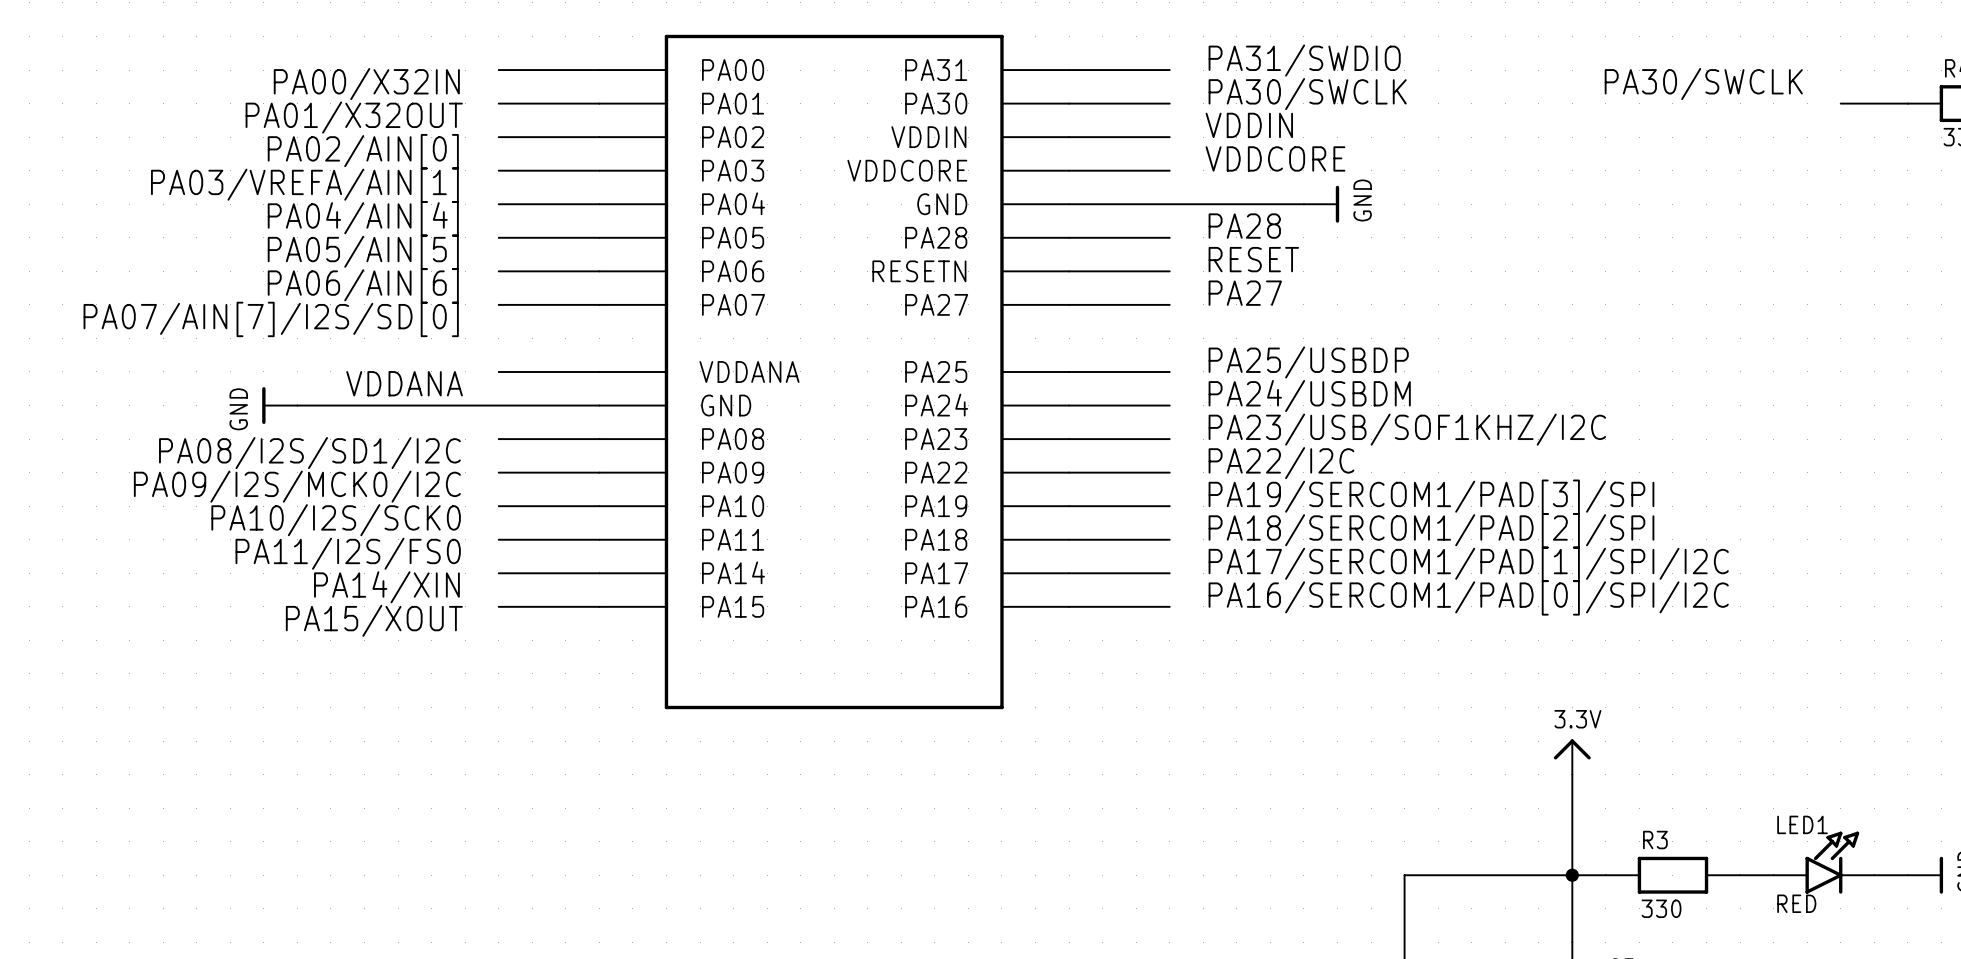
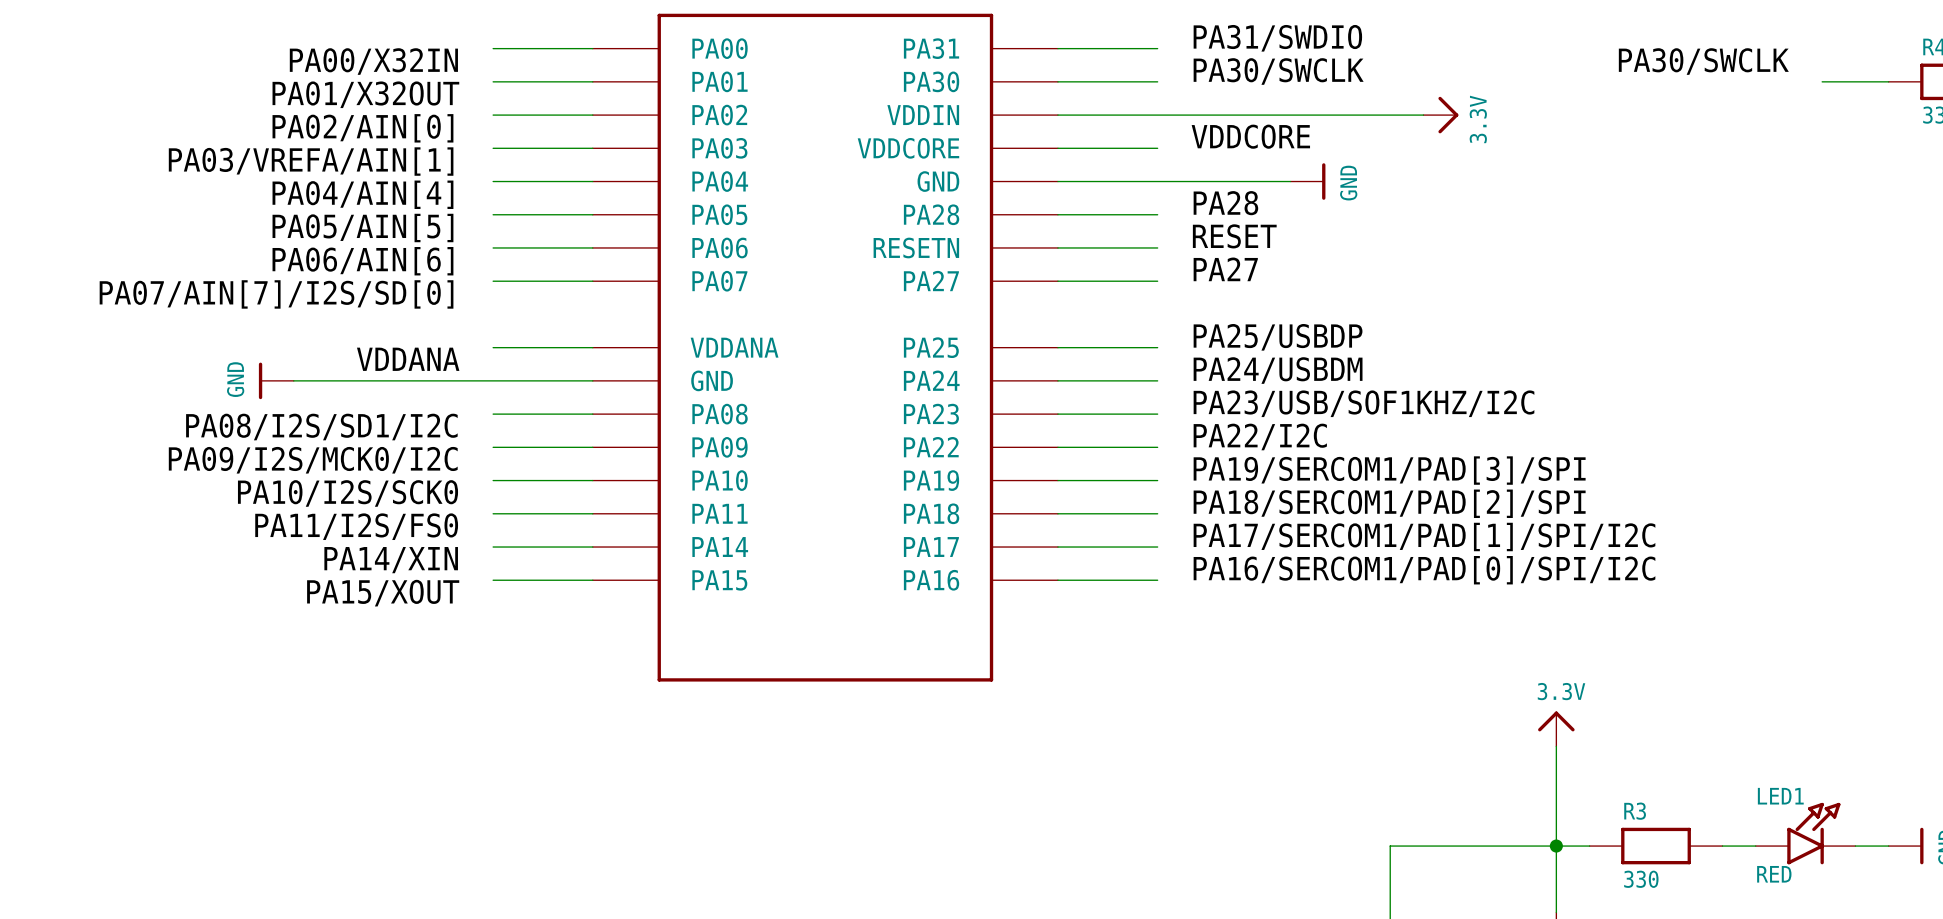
label: VDDIN (1249, 125) -> none
wire: none -> (1157, 115) (1423, 115)
power symbol: none -> 3.3V (1440, 115)

